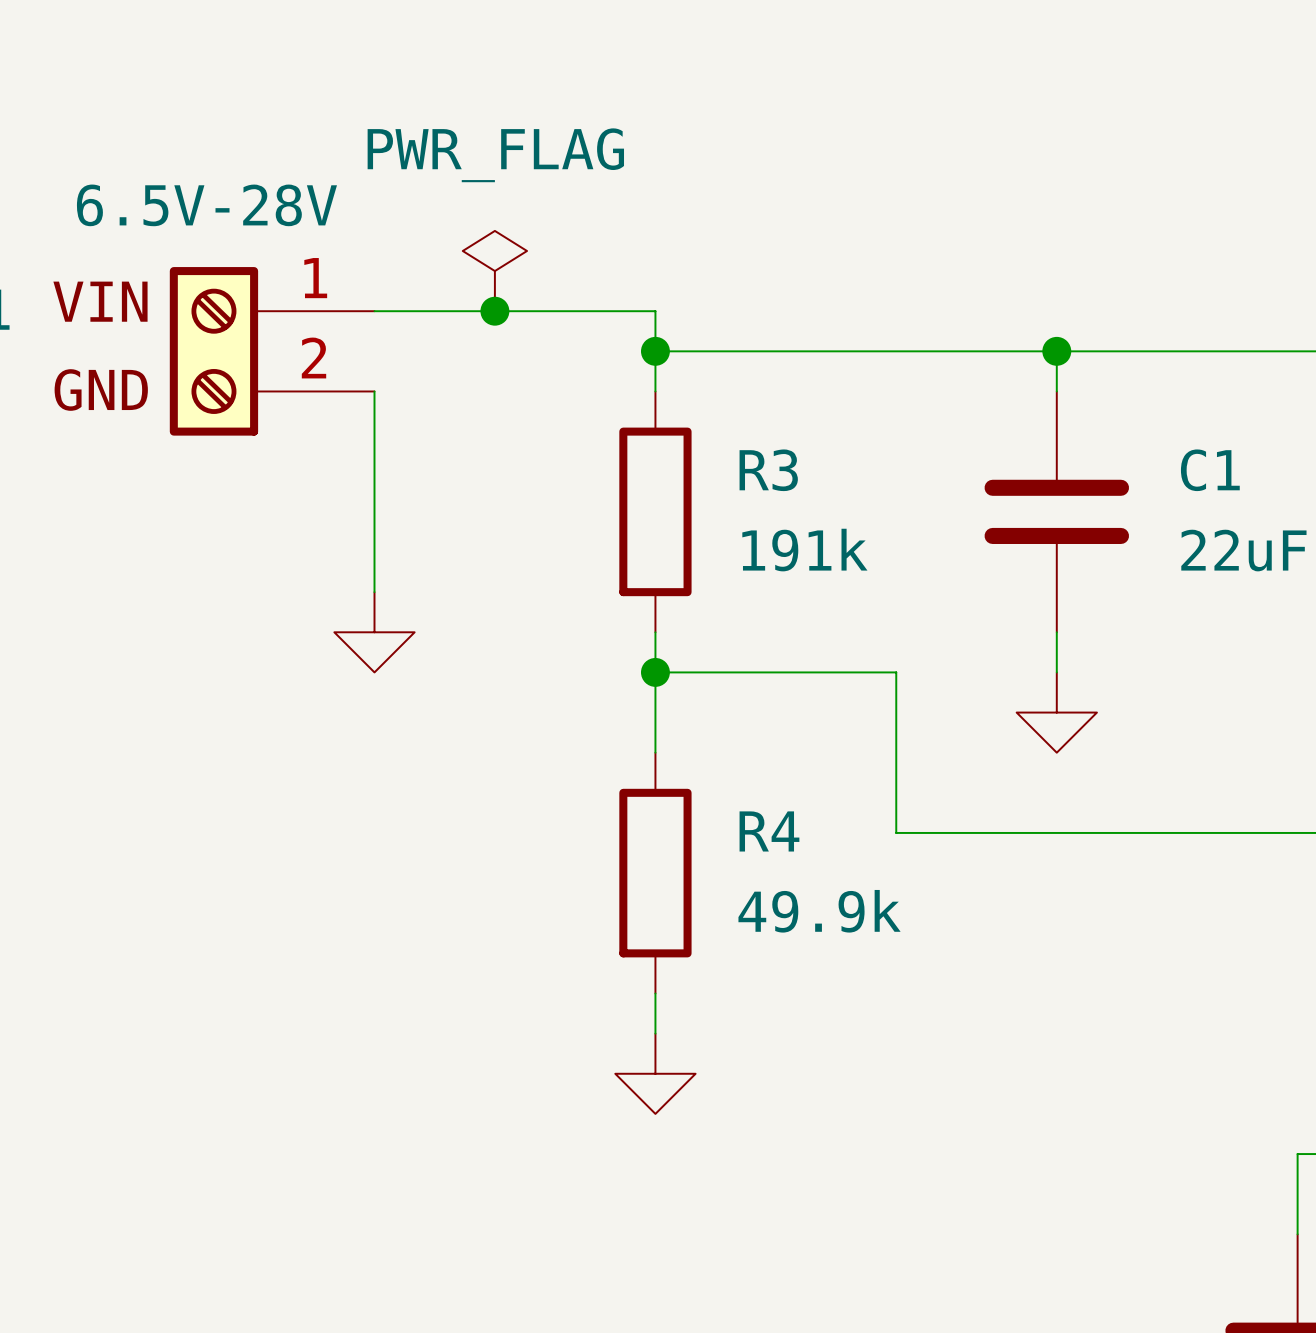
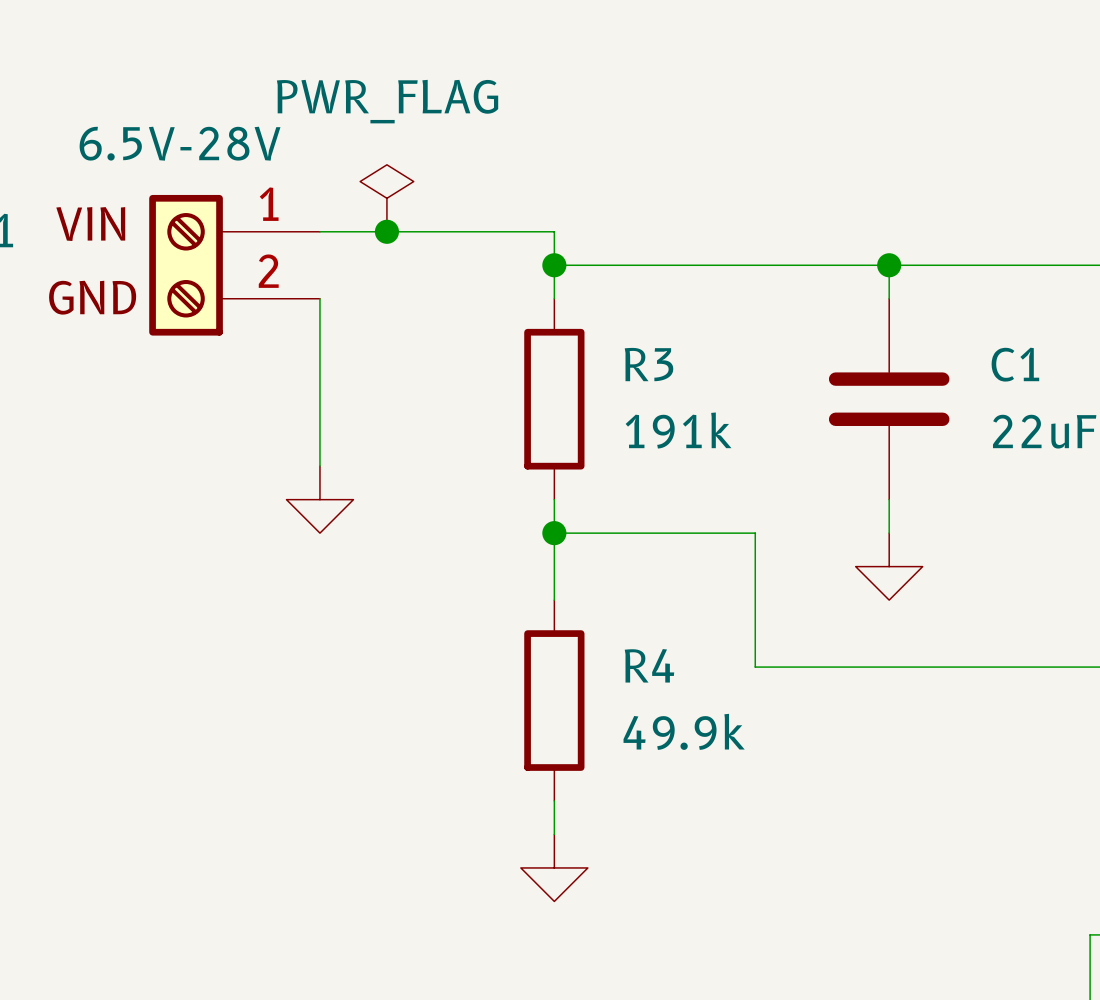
power symbol position: PWR_FLAG (494, 271) -> PWR_FLAG (386, 198)
junction position: (494, 311) -> (386, 231)

